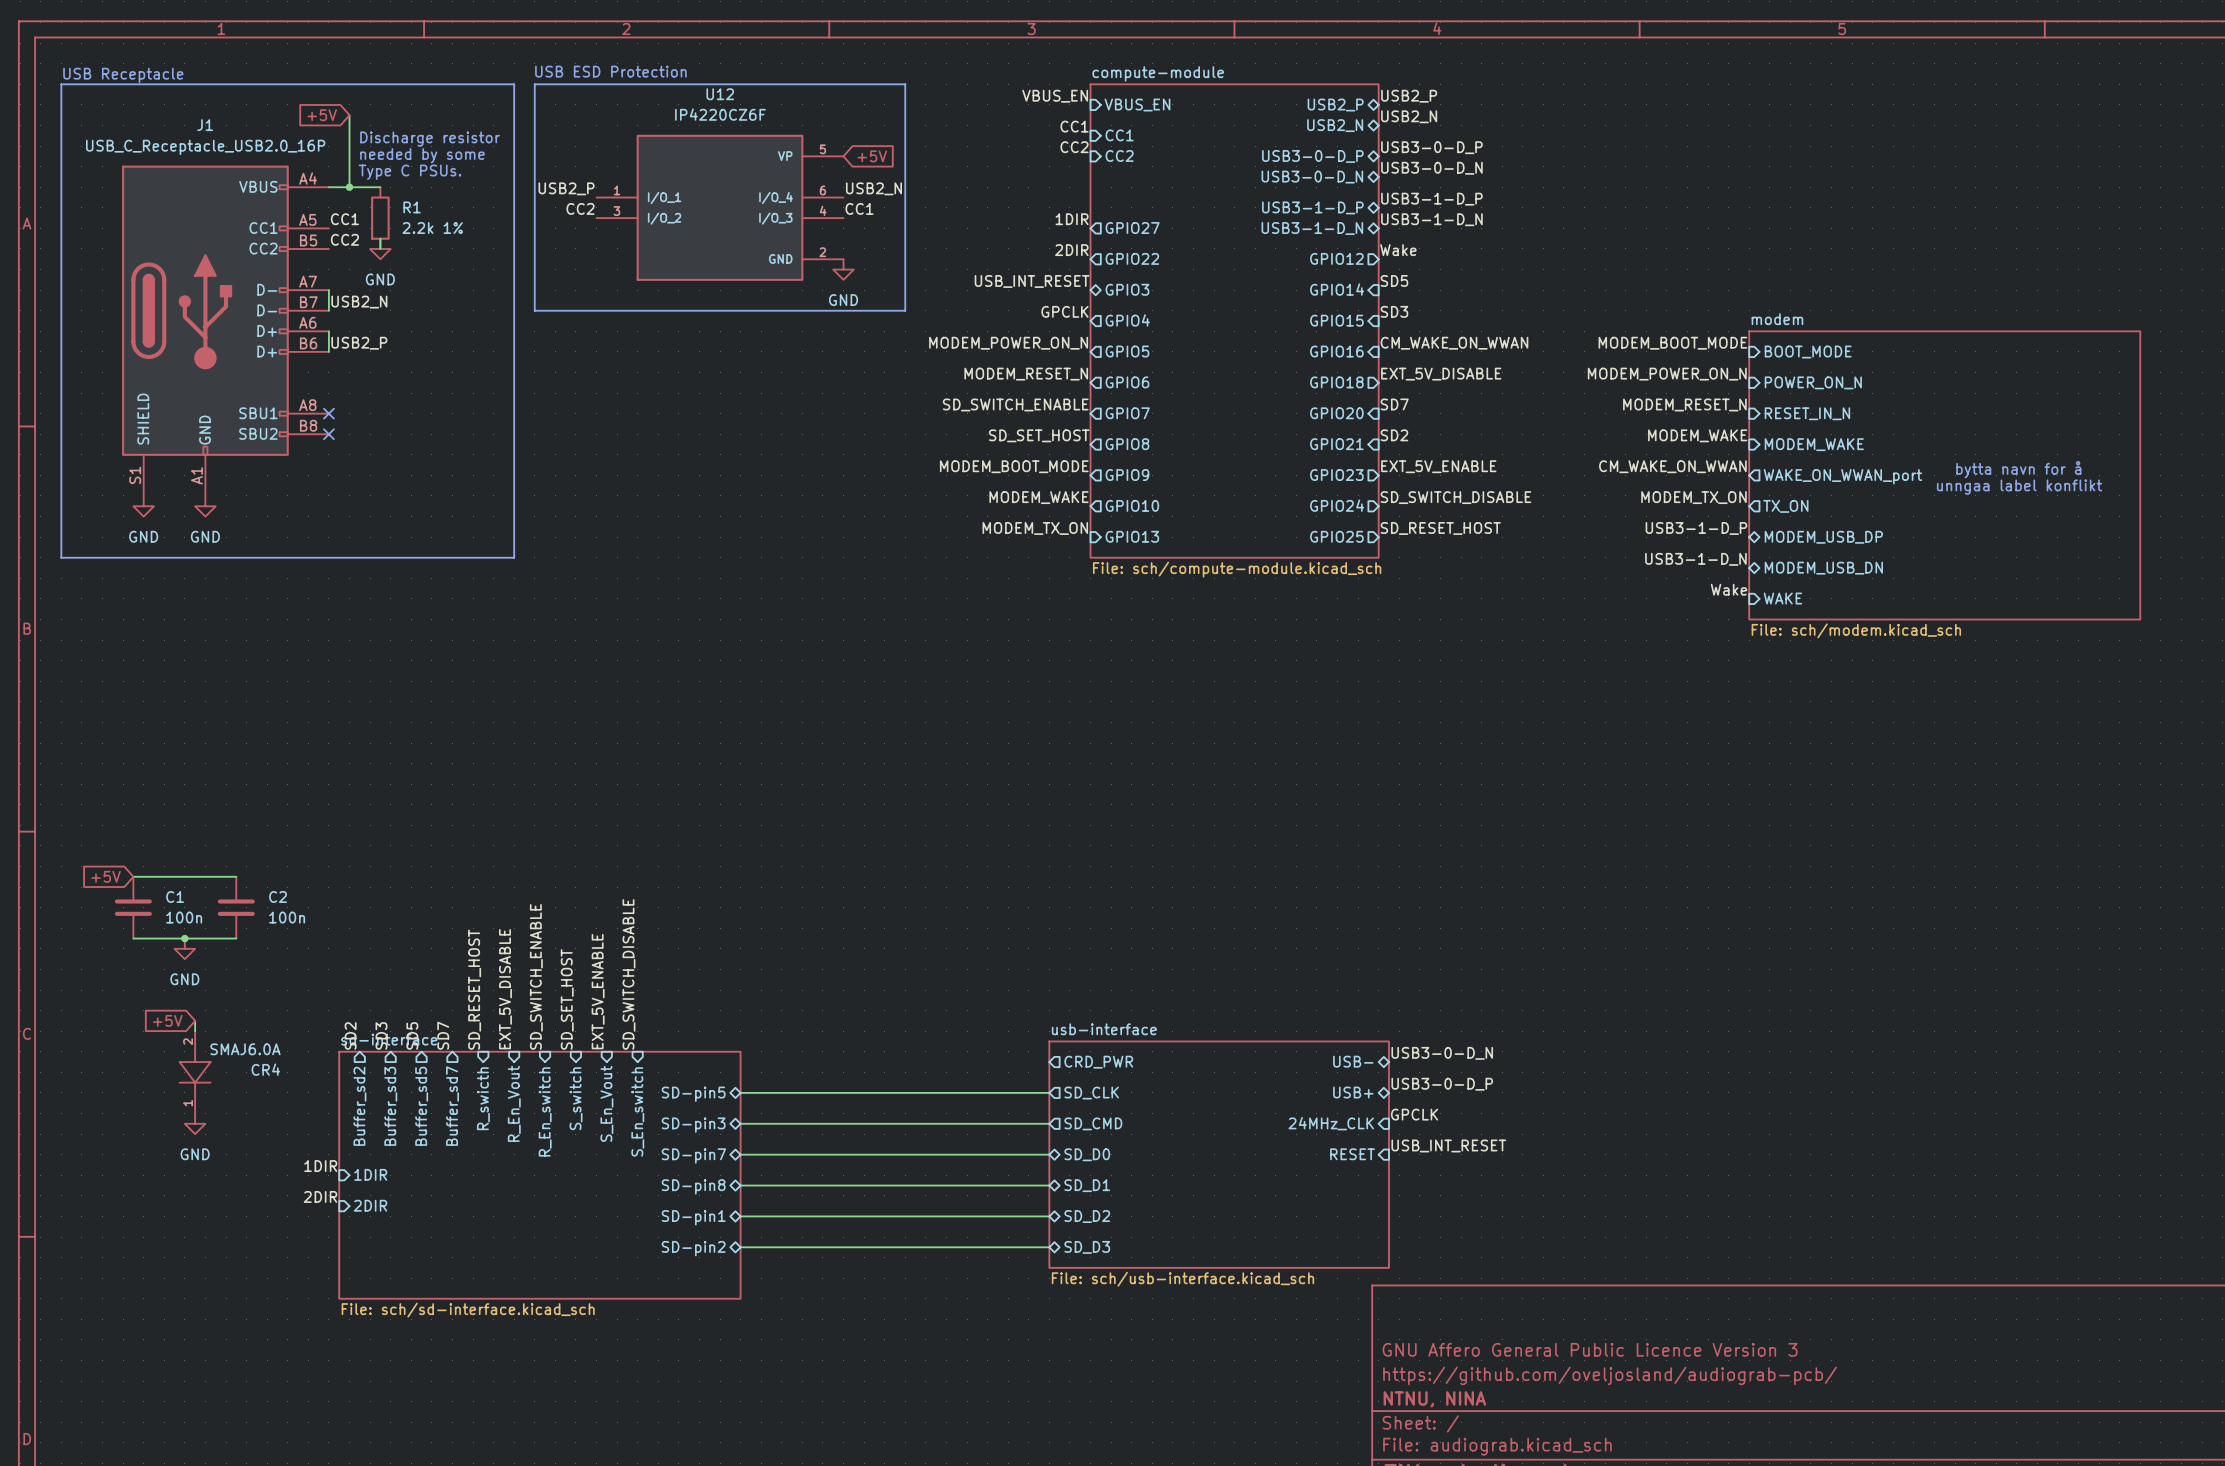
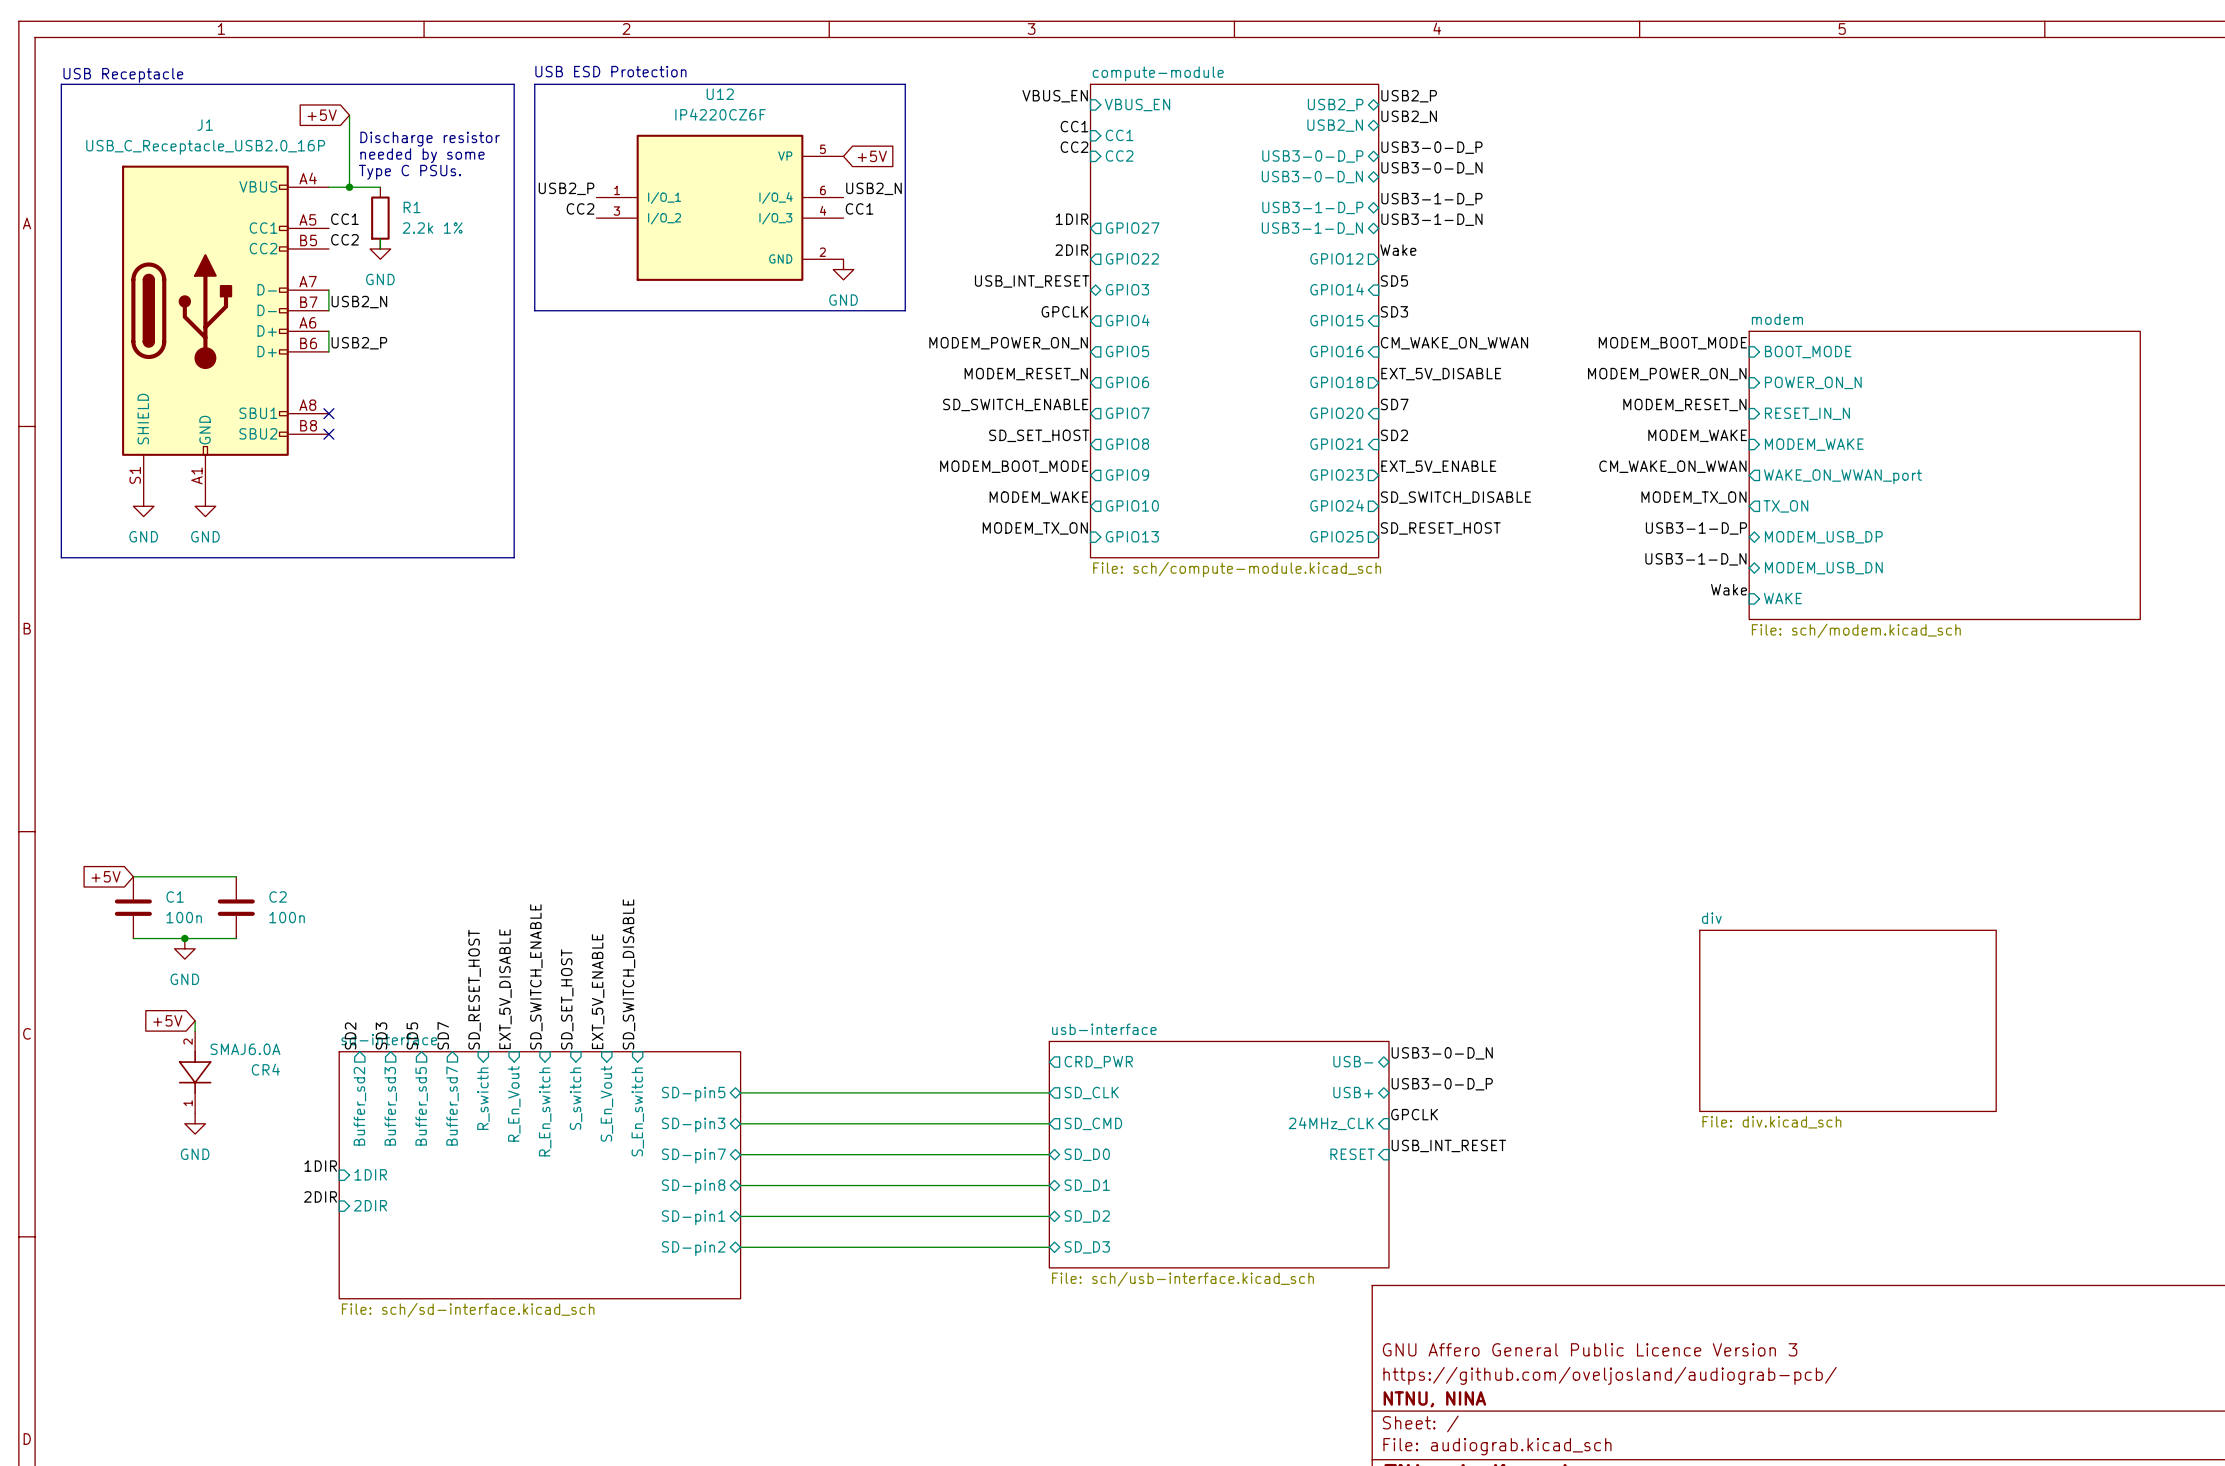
text: bytta navn for å (2018, 469) -> none
text: unngaa label konflikt (2019, 487) -> none
sheet div: none -> File: div.kicad_sch (1847, 1020)

